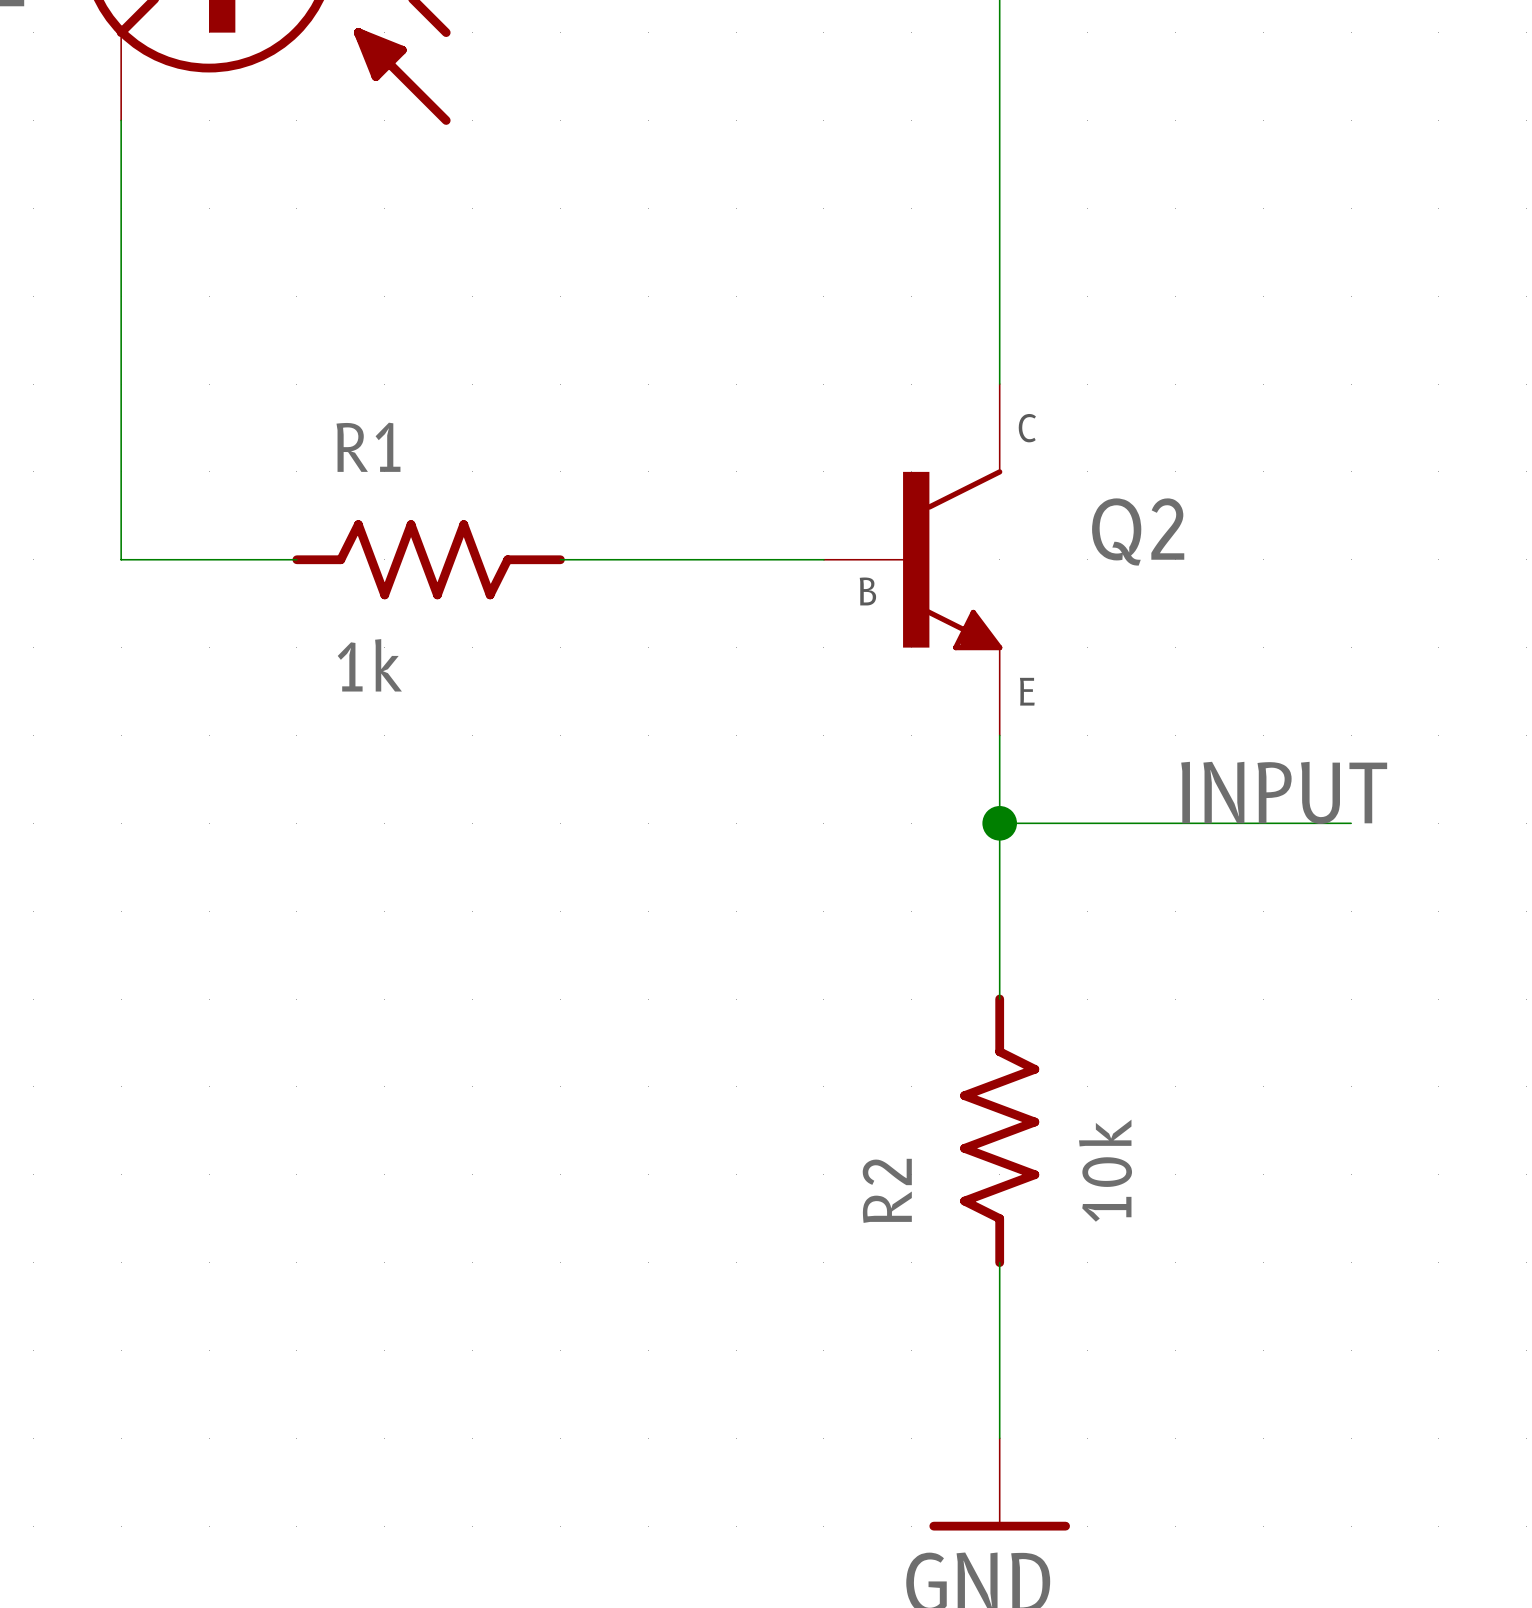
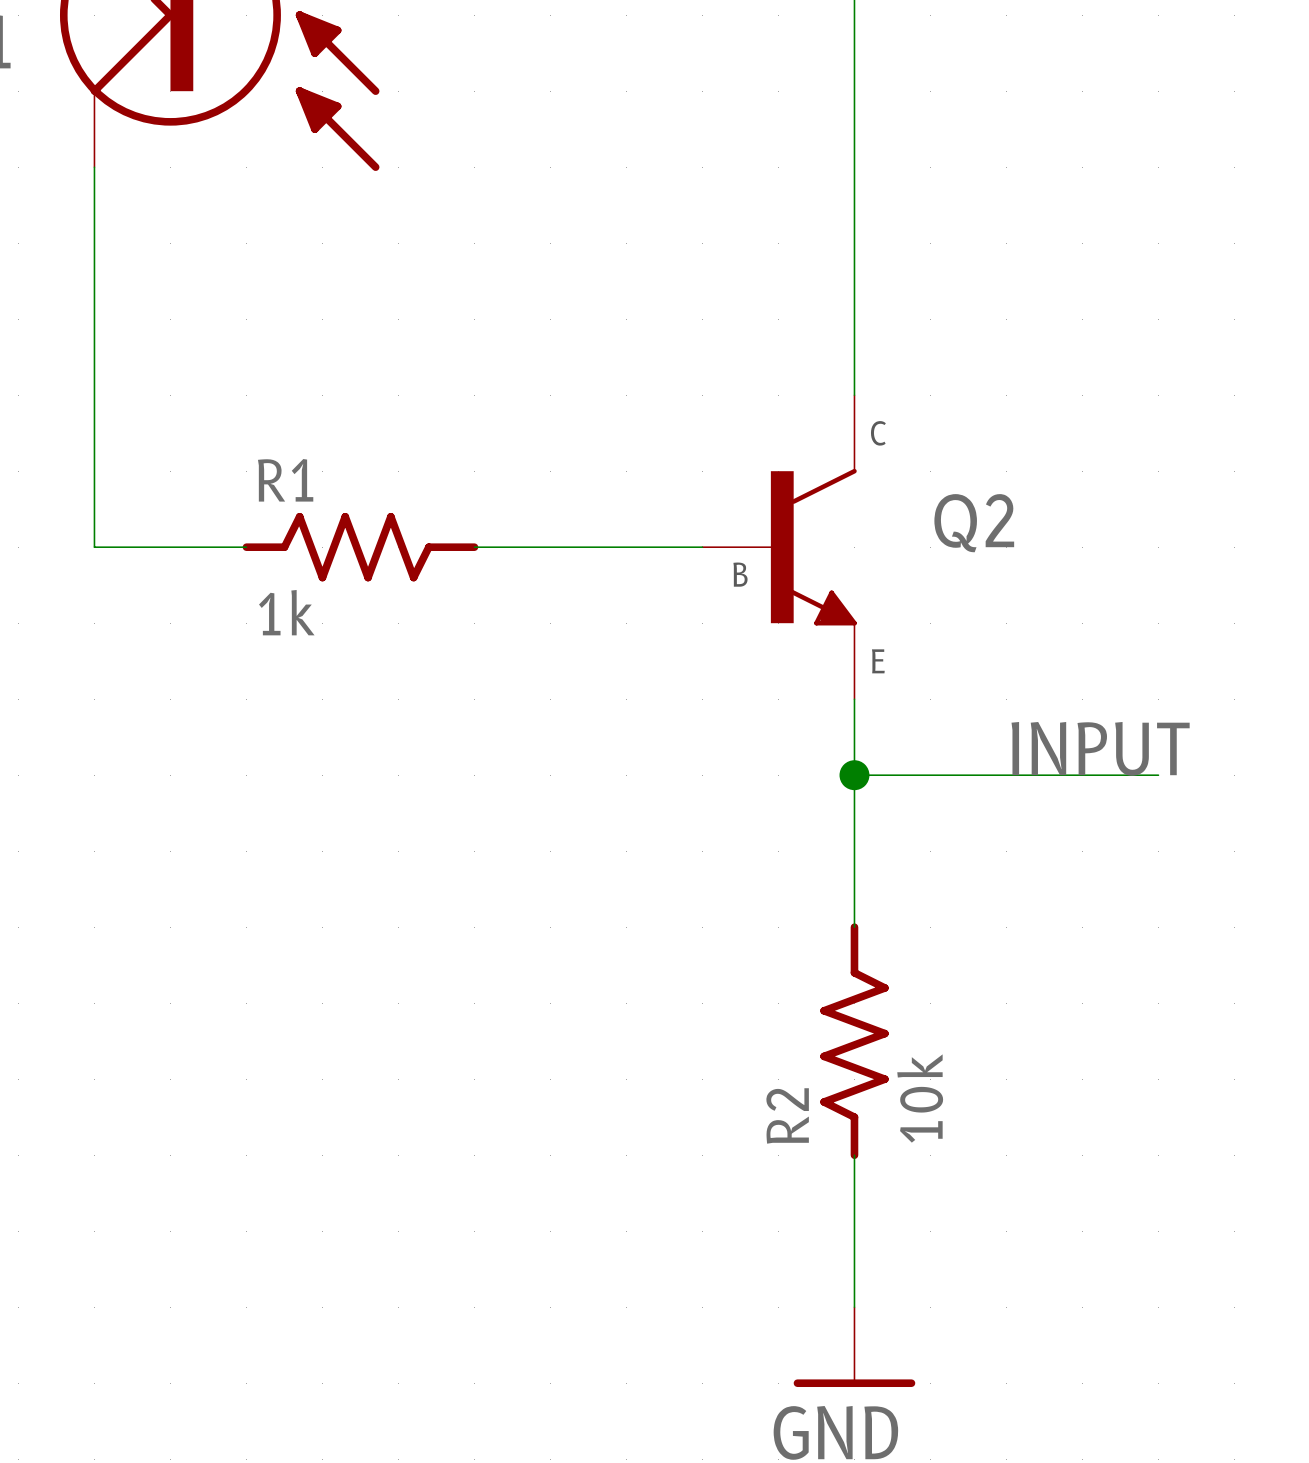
R1 name position: R1 (368, 447) -> R1 (285, 480)
R1 value position: 1k (369, 665) -> 1k (286, 612)
R2 value position: 10k (1105, 1170) -> 10k (920, 1098)
R2 name position: R2 (887, 1190) -> R2 (787, 1115)

